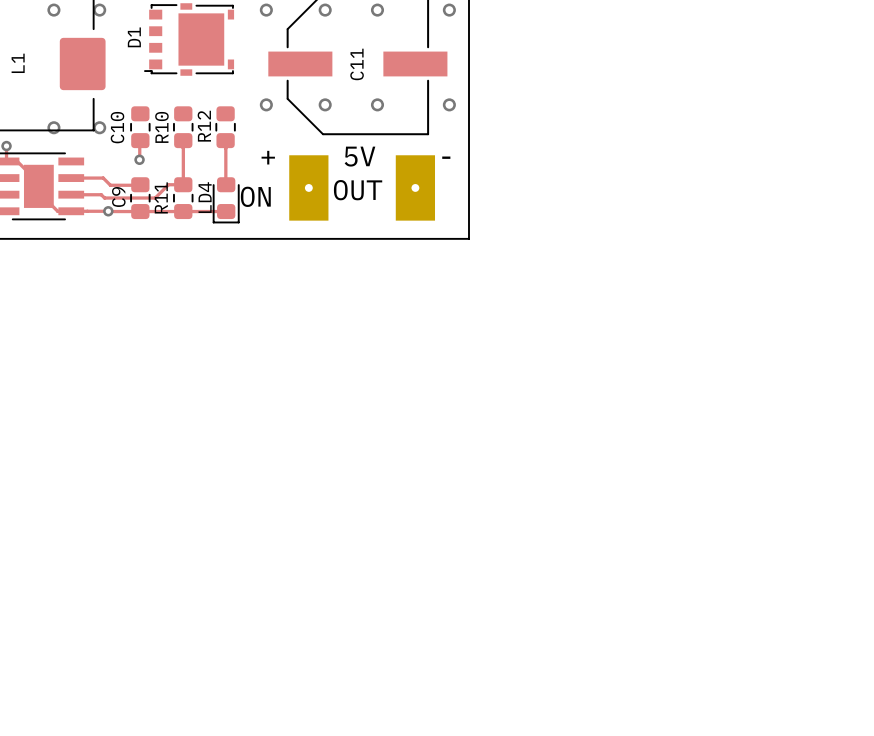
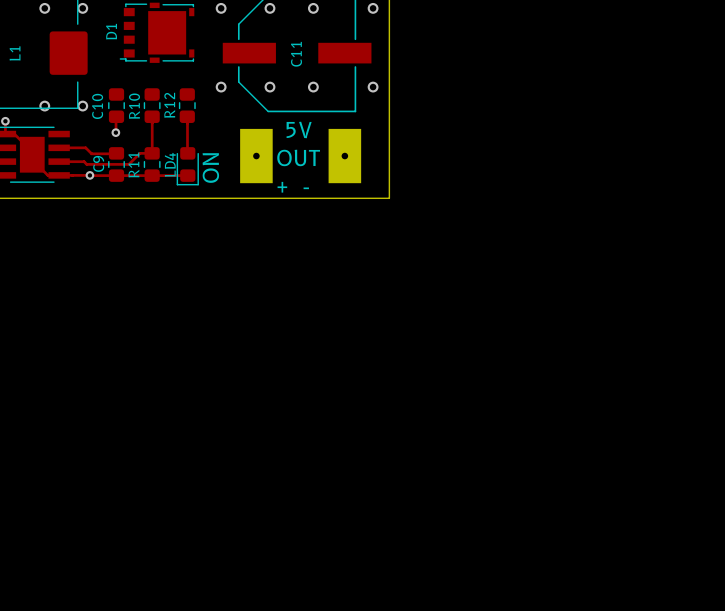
text position: + (268, 157) -> + (282, 187)
text position: - (446, 157) -> - (306, 188)
text rotation: 0° (255, 196) -> 90° counterclockwise (210, 168)

